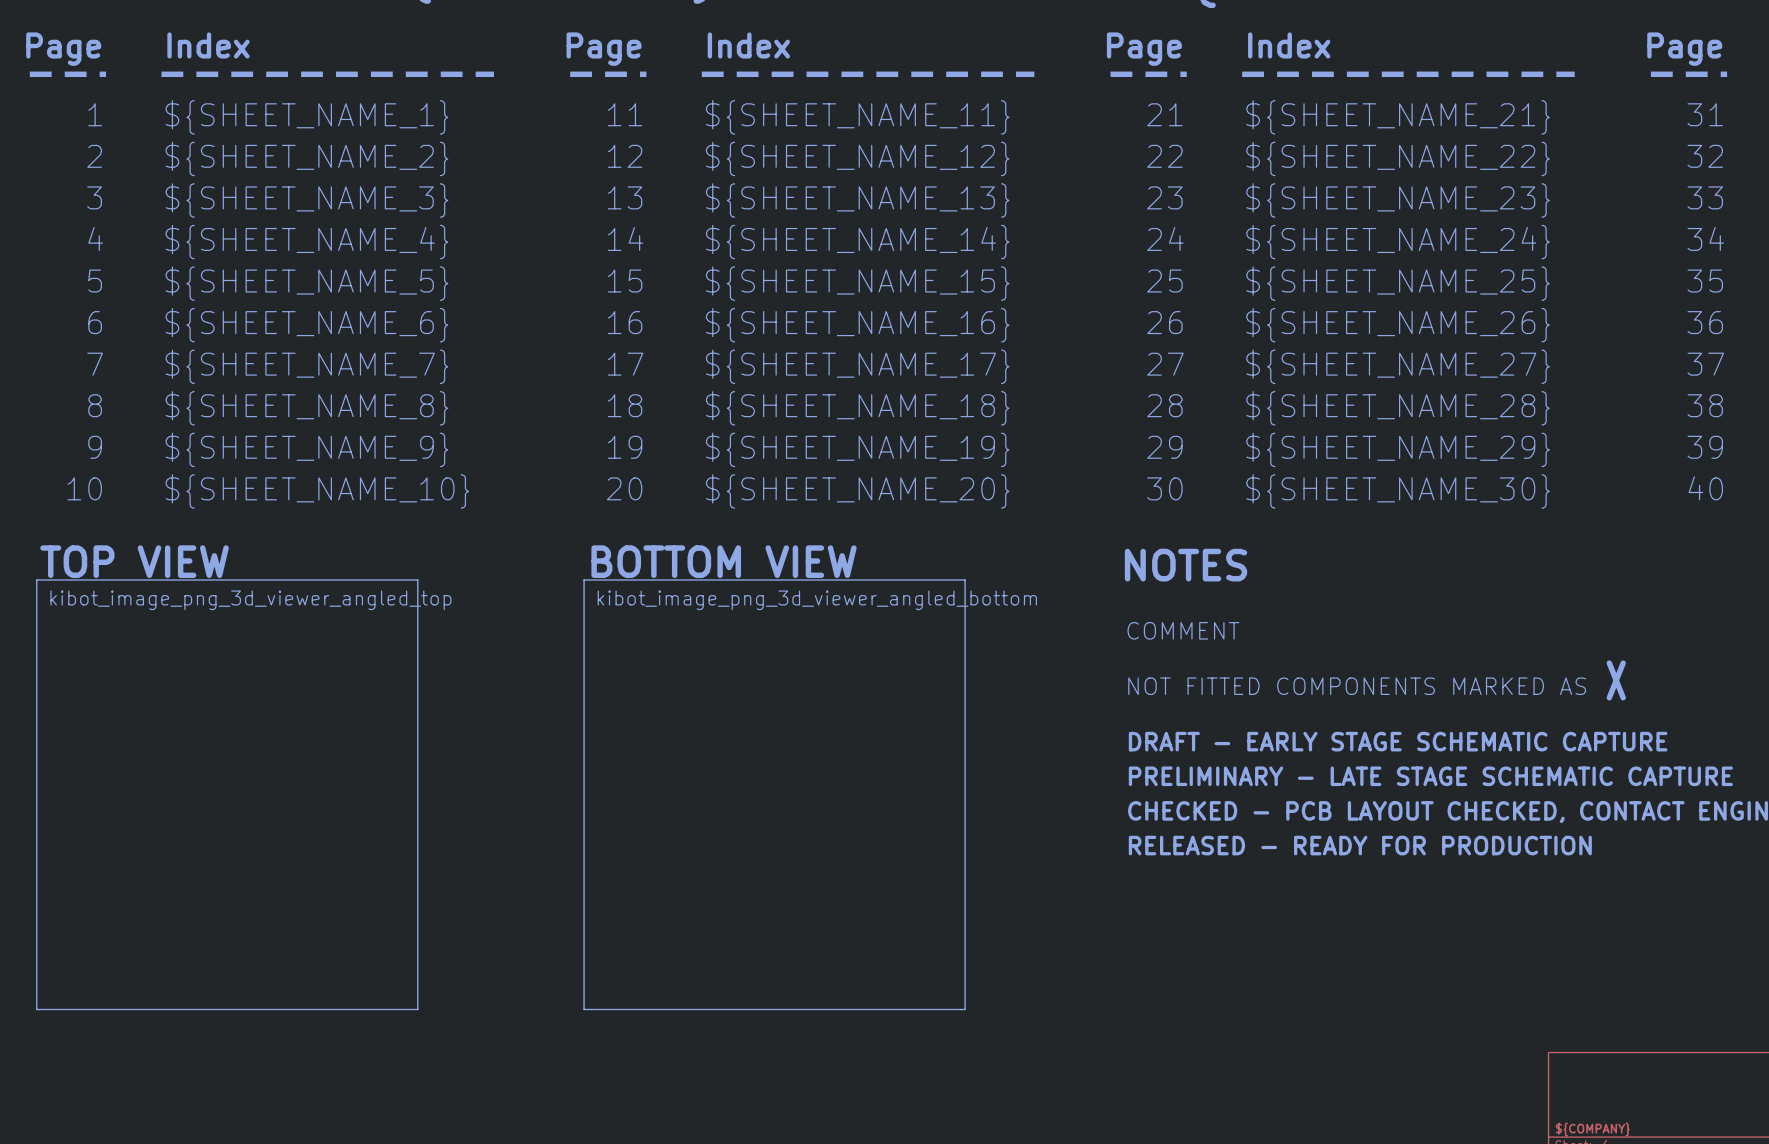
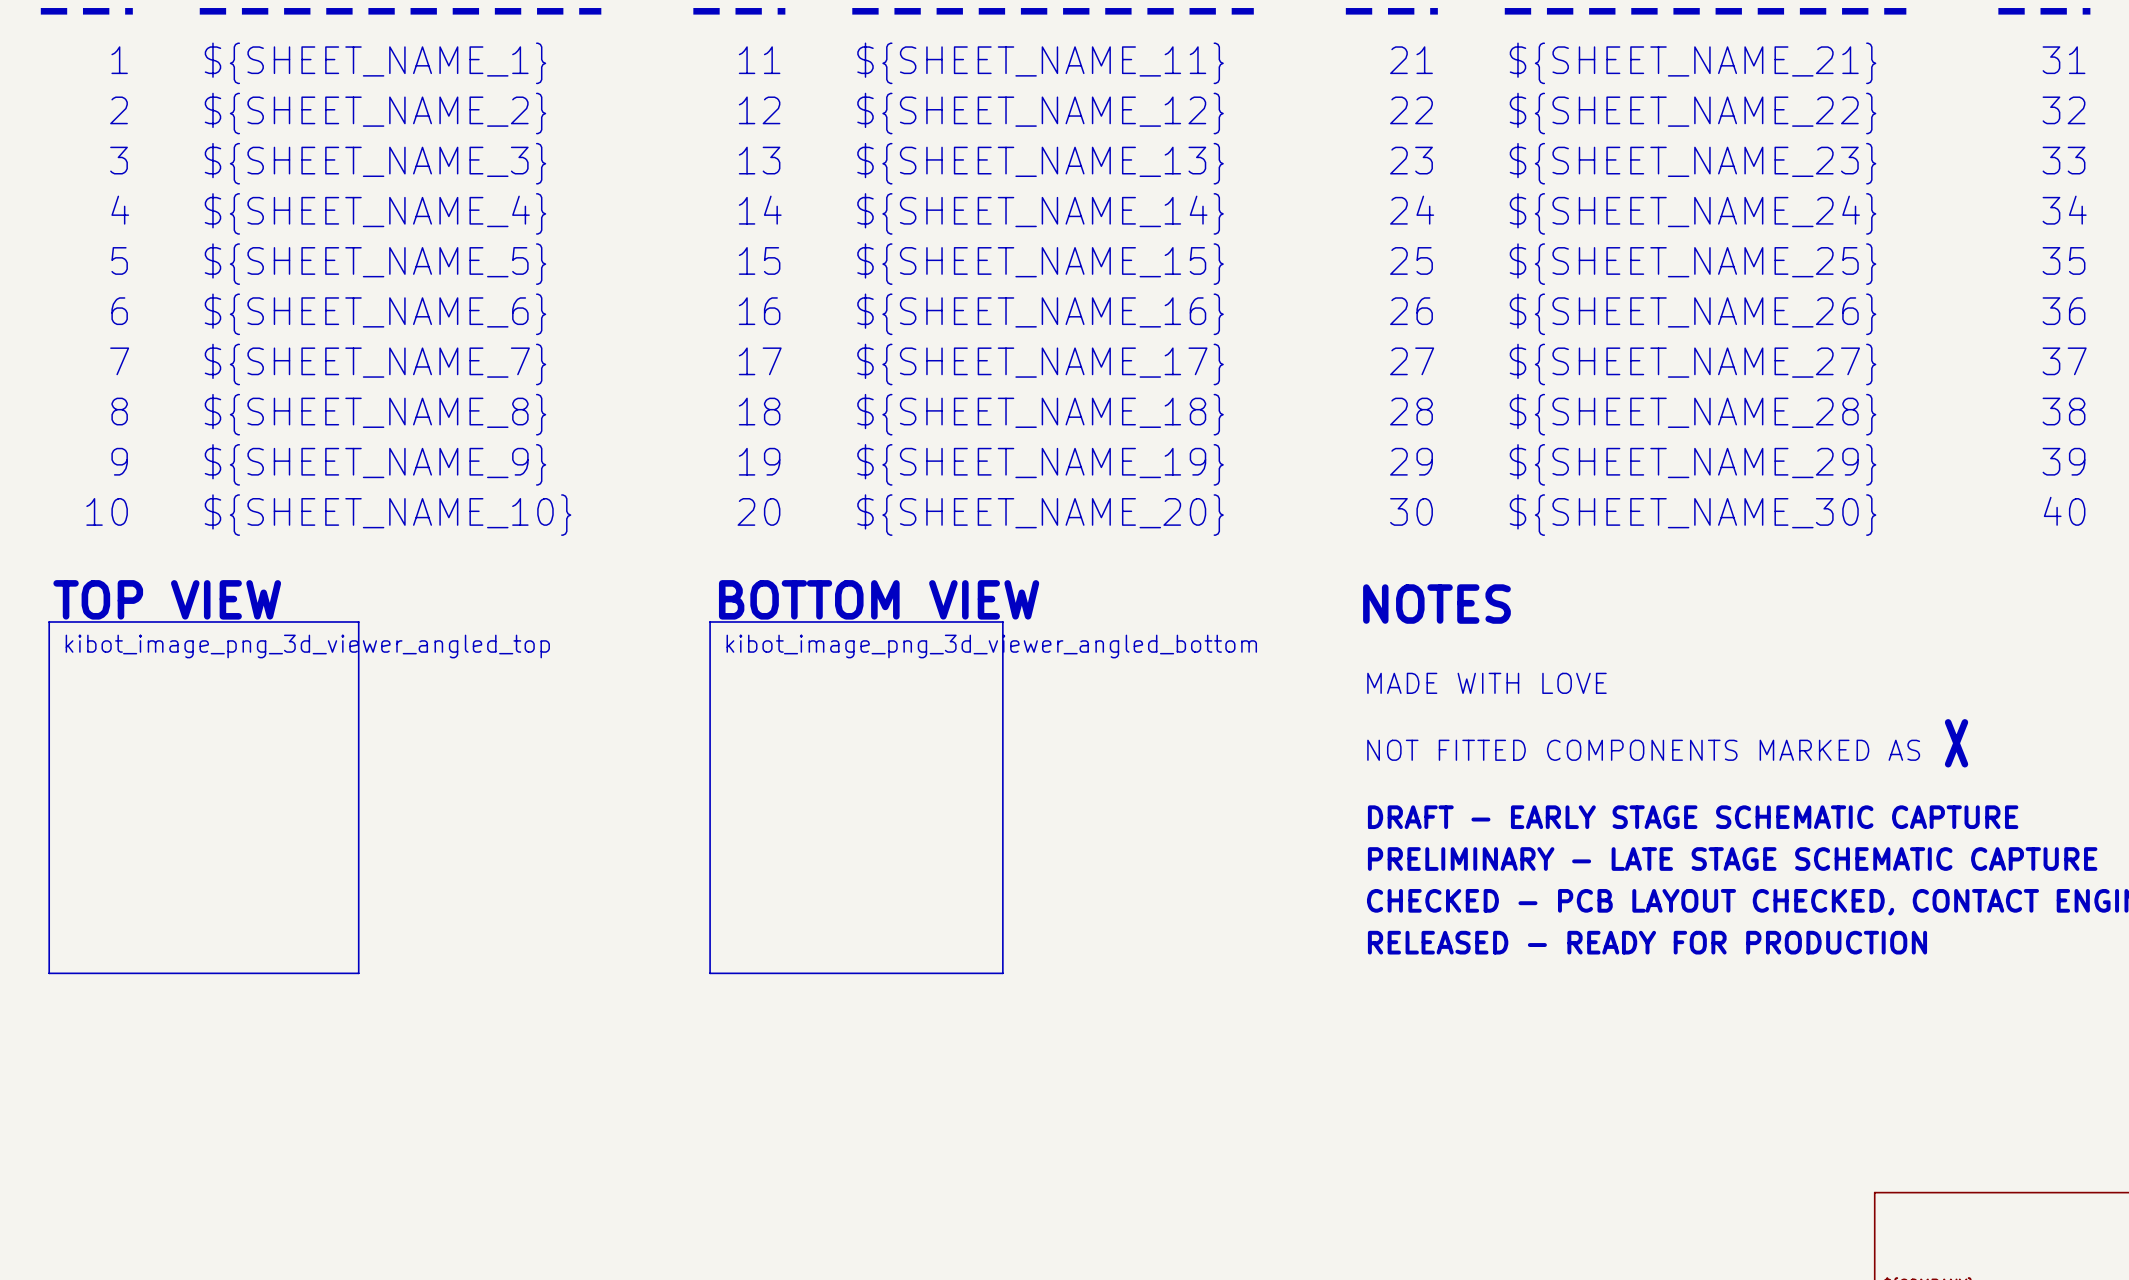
line: (293, 579) (417, 579) (417, 1009) (36, 1009) (36, 870) -> (358, 621) (358, 973) (49, 973)
line: (826, 579) (965, 579) (965, 1009) (584, 1009) (584, 870) -> (1002, 621) (1002, 973) (710, 973)
text: COMMENT (1183, 630) -> MADE WITH LOVE (1486, 683)

